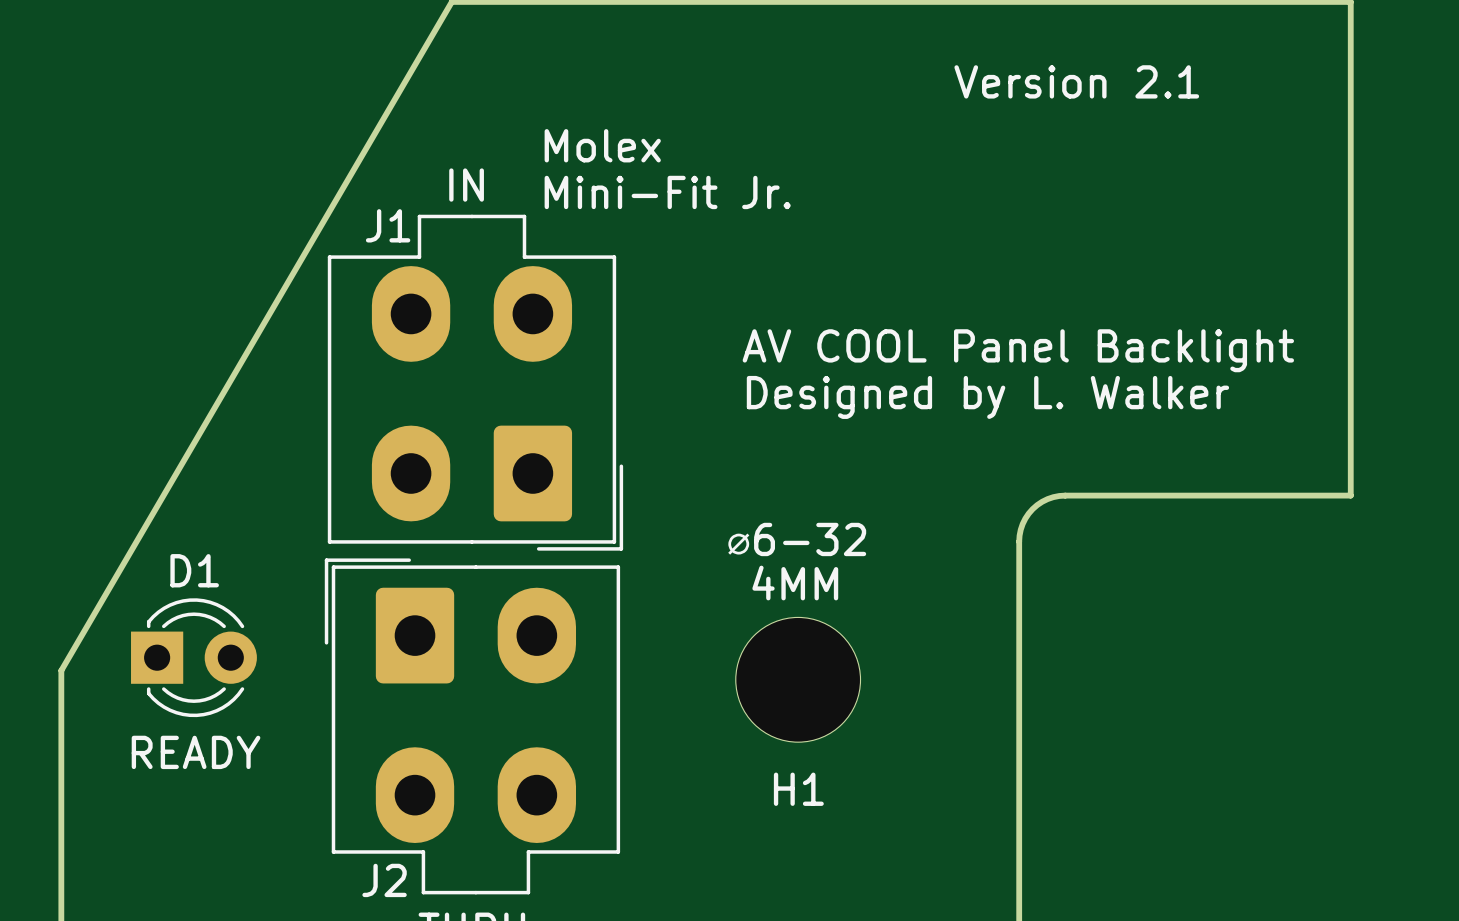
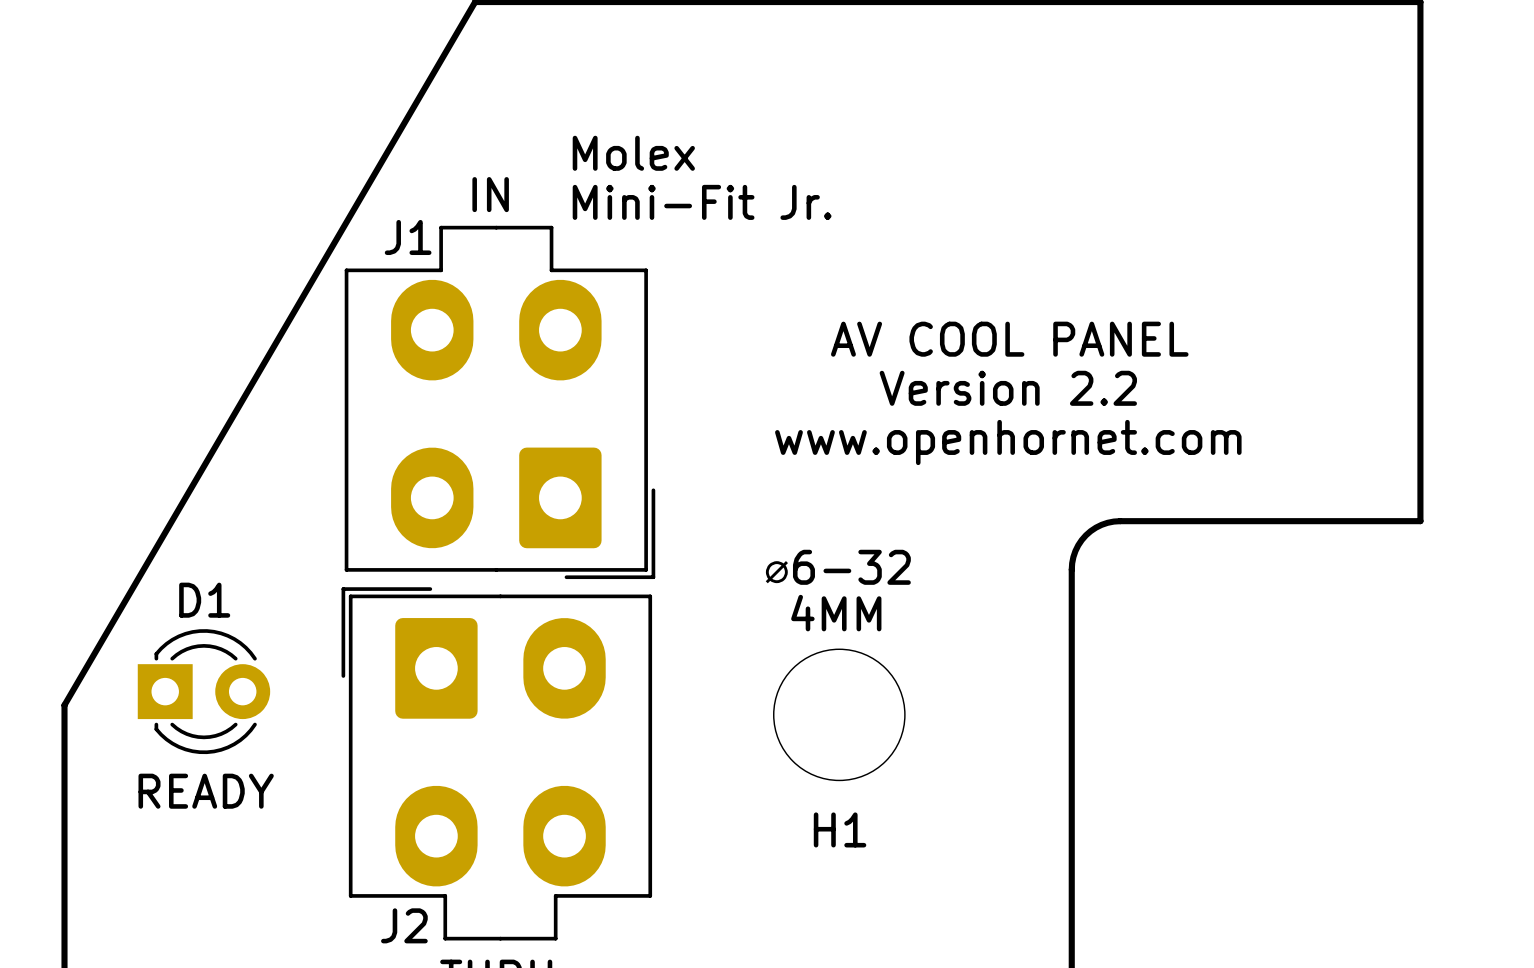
text: Version 2.1 (1076, 81) -> none
text: none -> AV COOL PANEL (1009, 339)
text: AV COOL Panel Backlight (1018, 350) -> none
text: none -> Version 2.2 (1008, 388)
text: Designed by L. Walker (987, 397) -> none
text: none -> www.openhornet.com (1008, 442)

